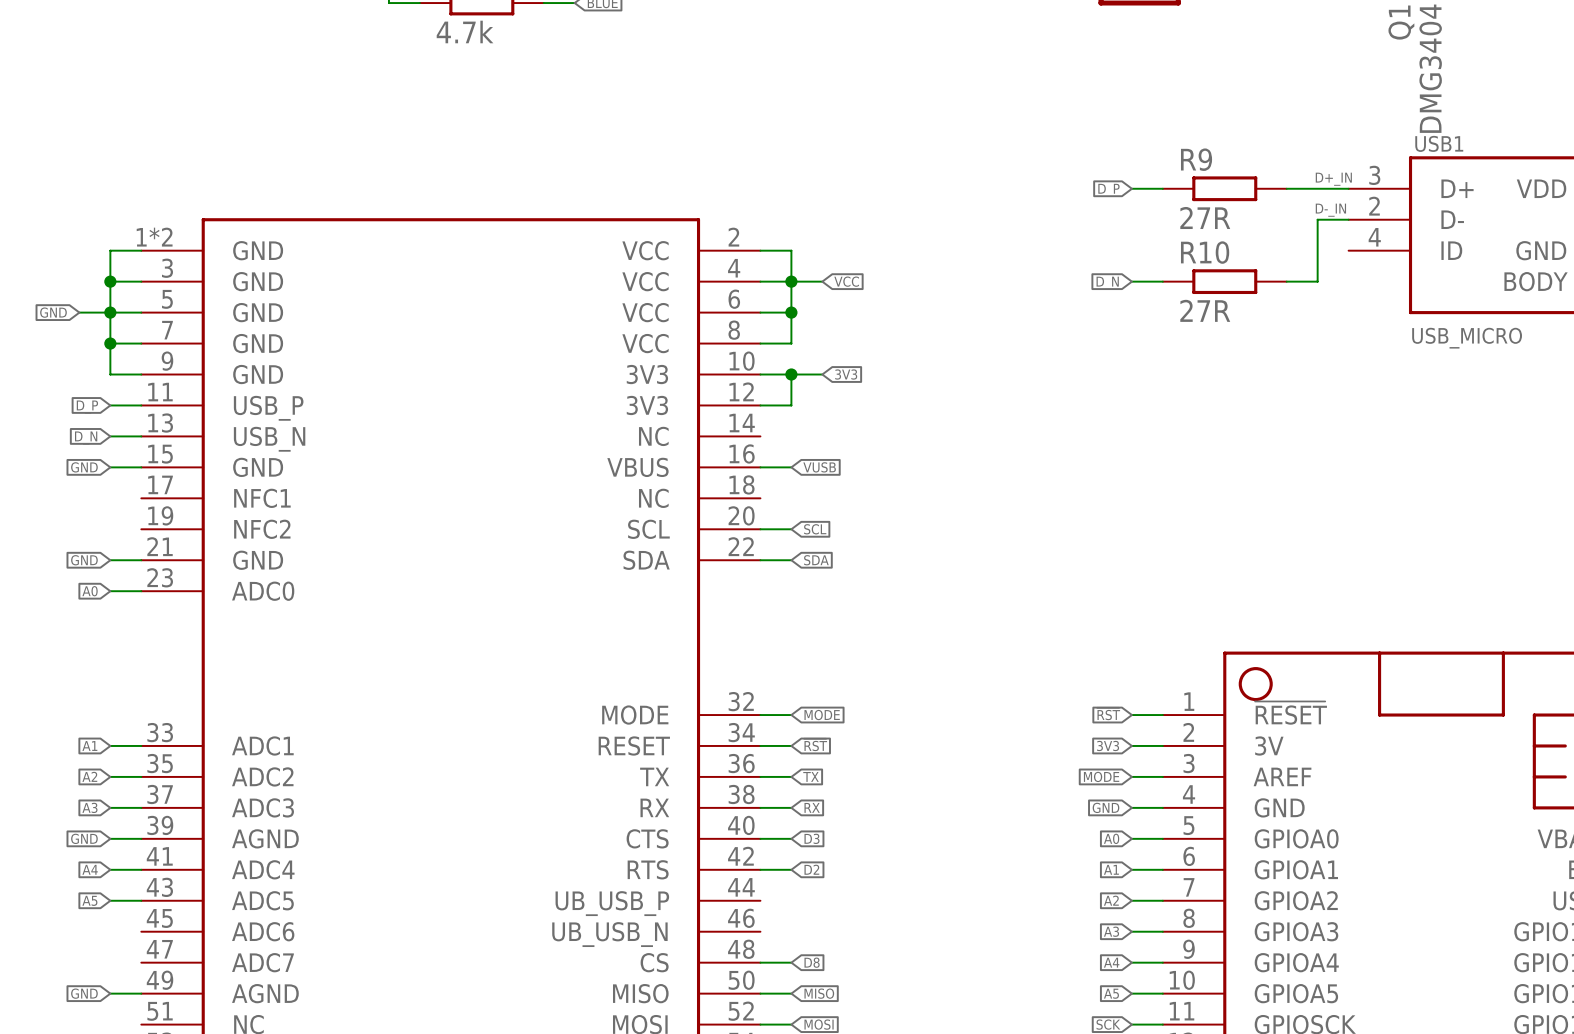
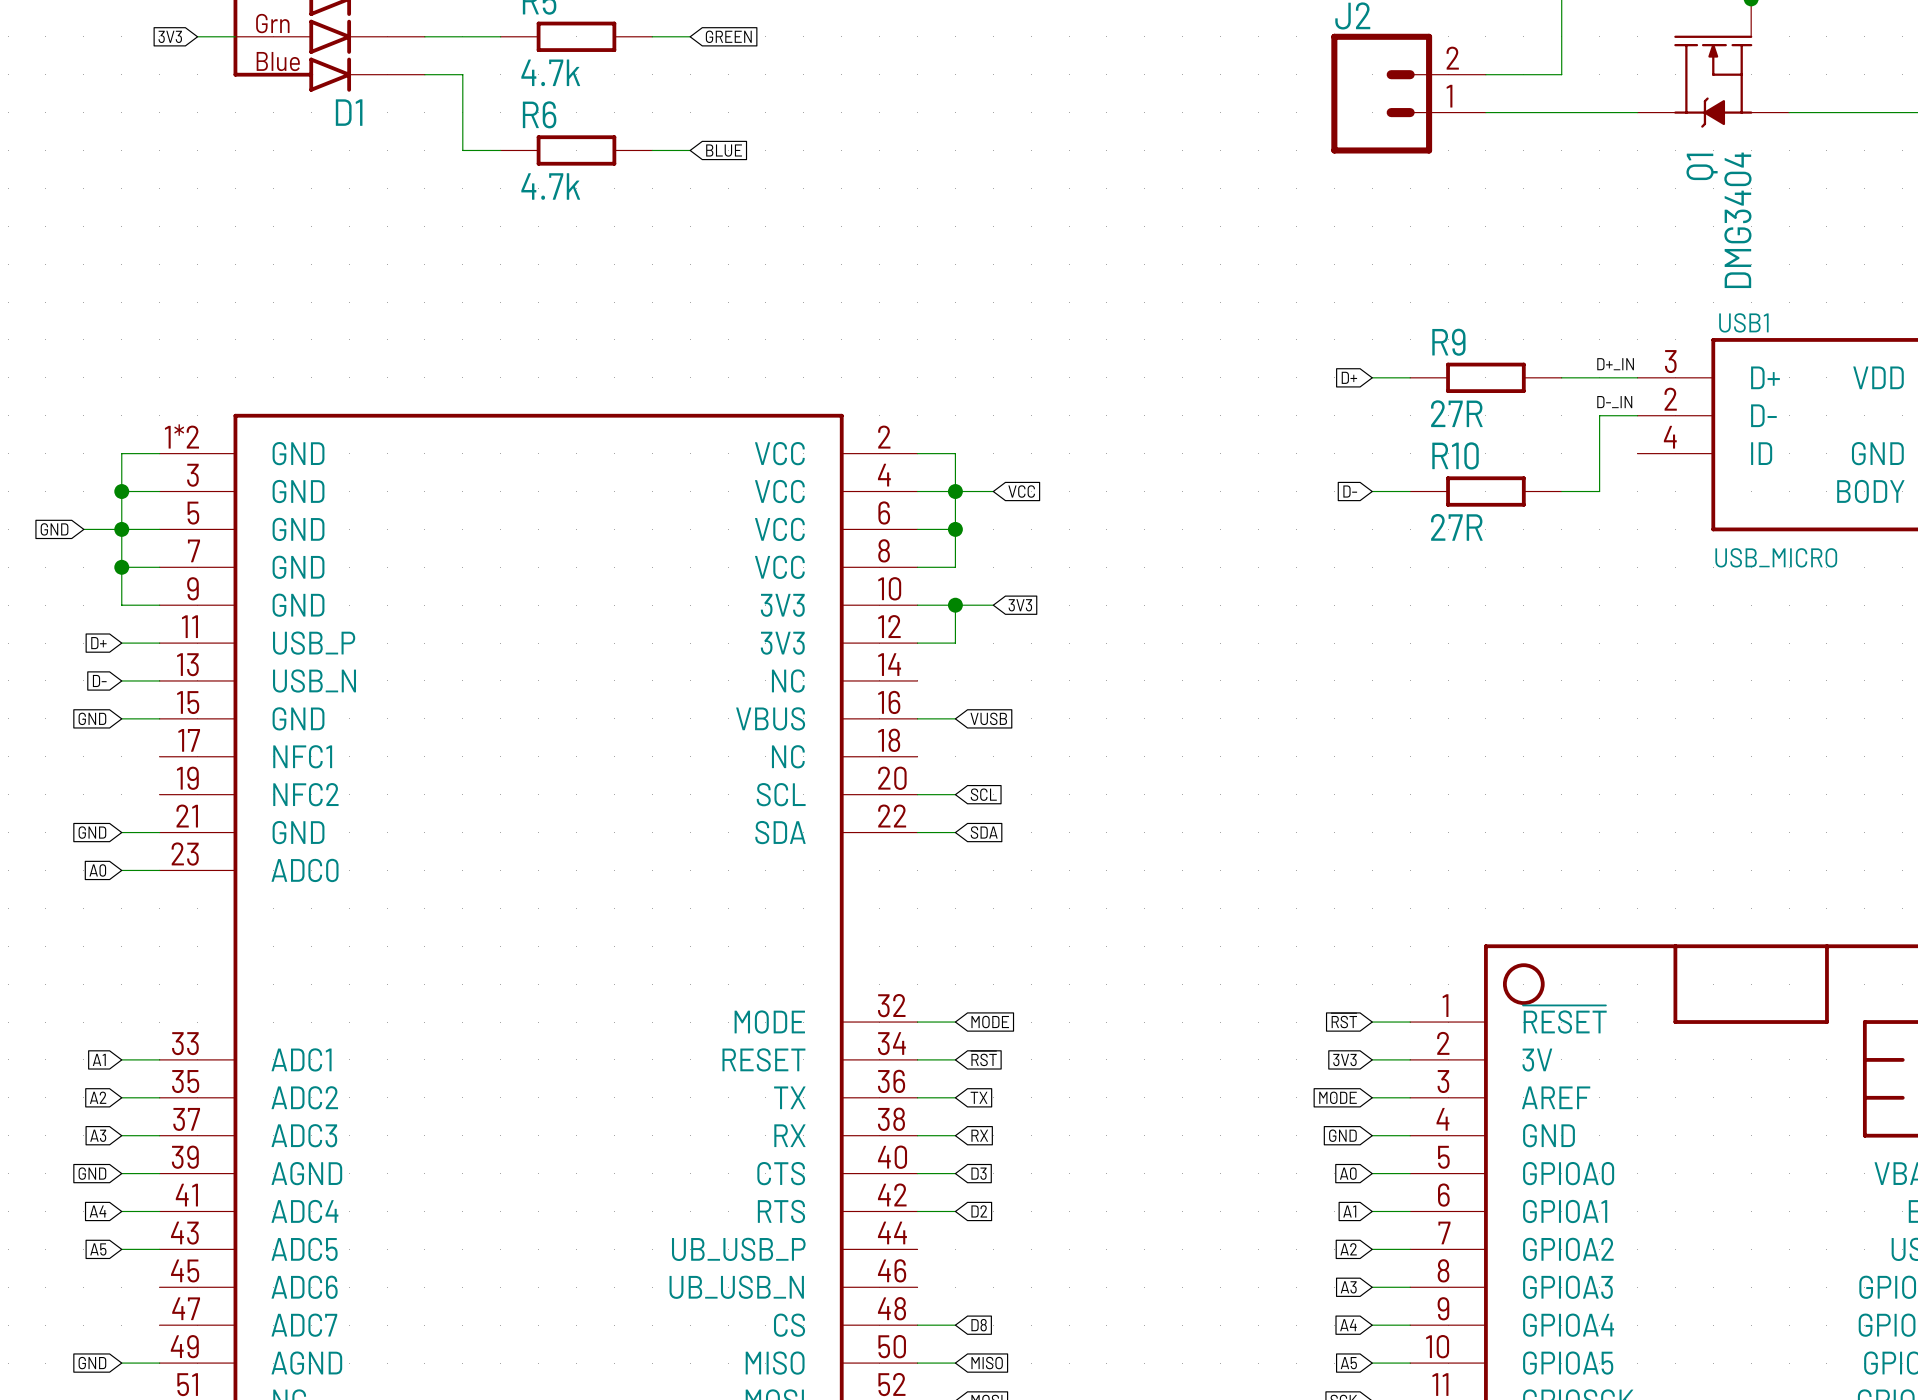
global label: D_P (1108, 190) -> D+ (1349, 377)
global label: D_N (1107, 283) -> D- (1350, 491)
global label: D_P (87, 407) -> D+ (98, 643)
global label: D_N (86, 438) -> D- (99, 680)

